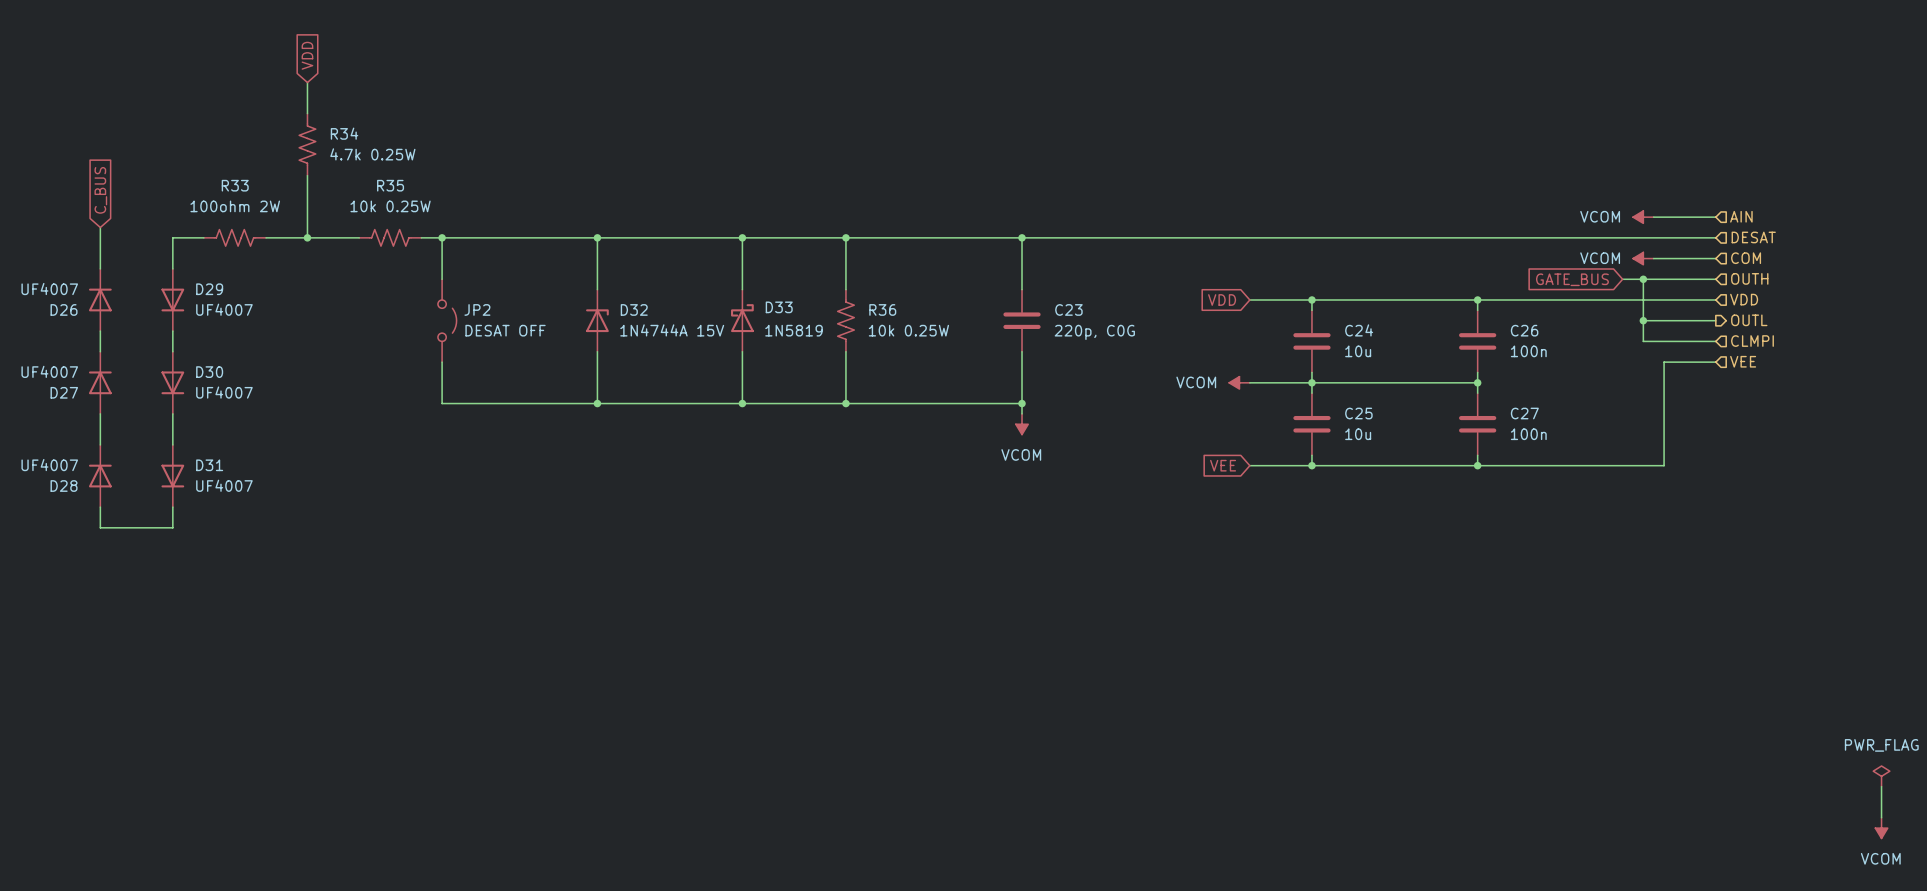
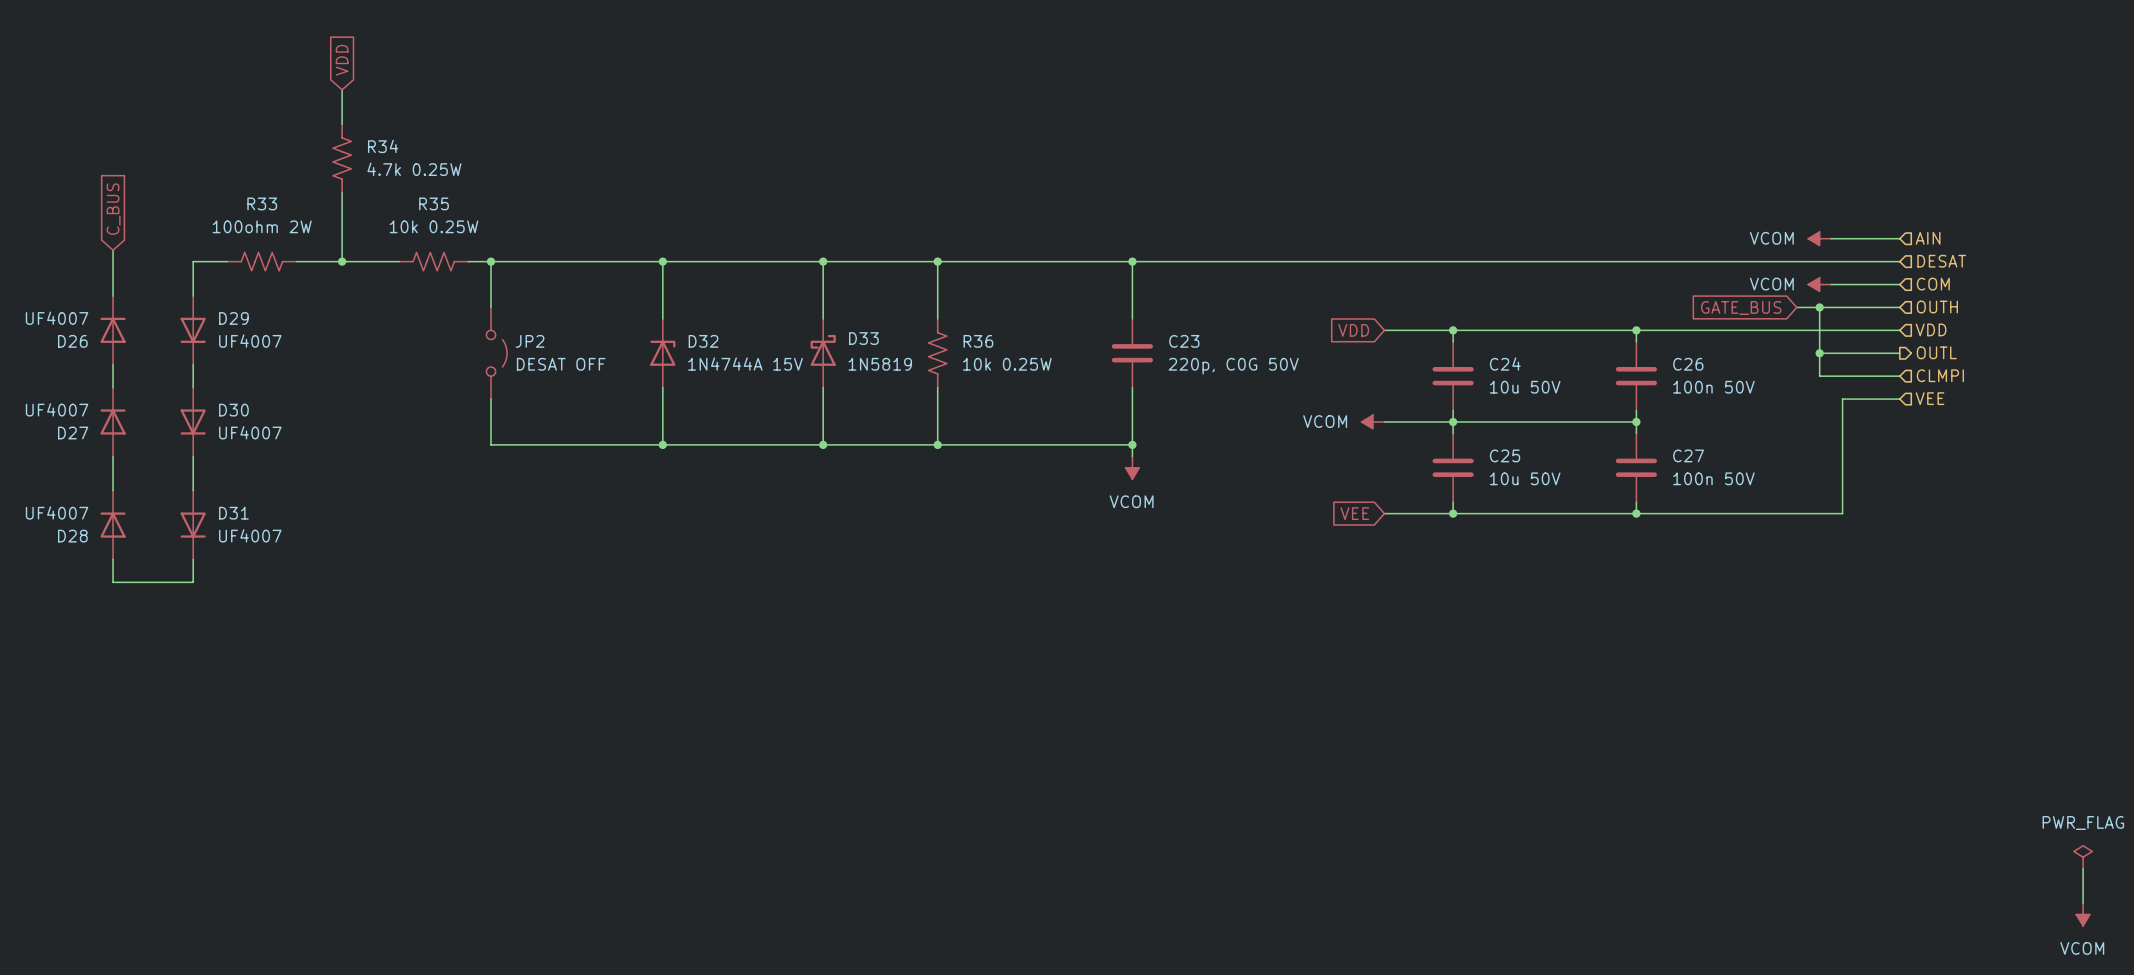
C23 value: 220p, C0G (1094, 332) -> 220p, C0G 50V (1233, 366)
C24 value: 10u (1358, 351) -> 10u 50V (1525, 387)
C26 value: 100n (1528, 351) -> 100n 50V (1713, 387)
C25 value: 10u (1358, 434) -> 10u 50V (1525, 478)
C27 value: 100n (1528, 434) -> 100n 50V (1713, 478)

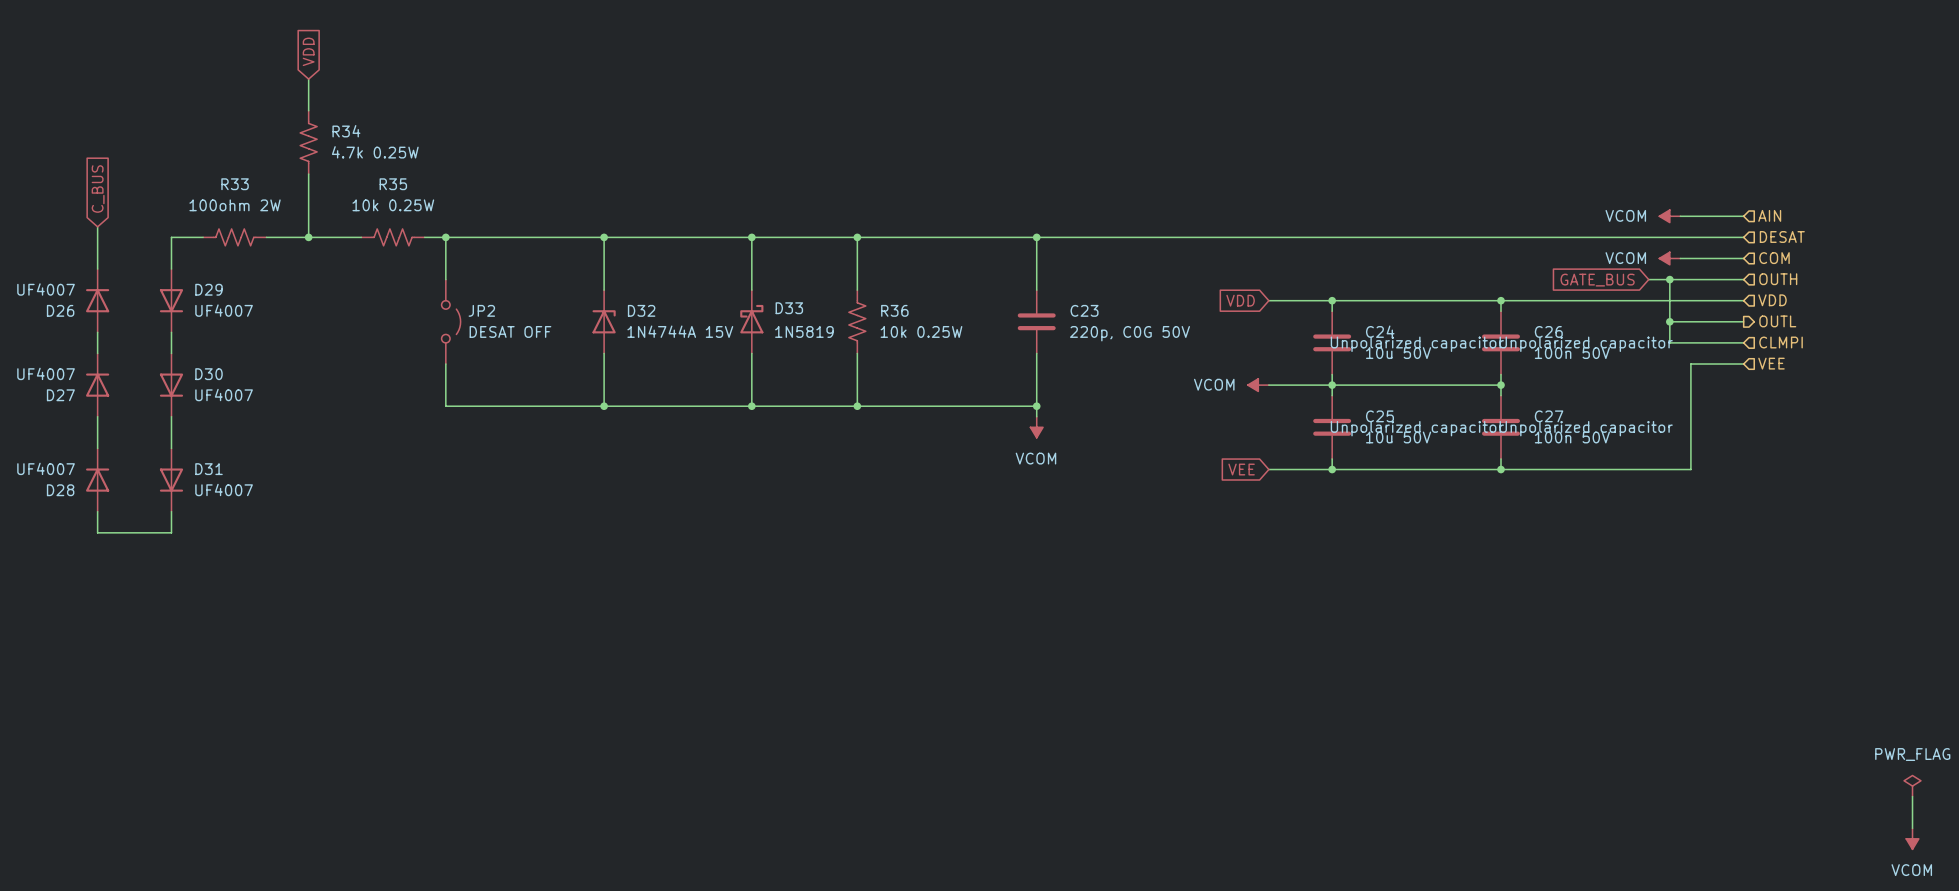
C24 text: none -> Unpolarized capacitor (1417, 344)
C26 text: none -> Unpolarized capacitor (1586, 344)
C25 text: none -> Unpolarized capacitor (1417, 428)
C27 text: none -> Unpolarized capacitor (1586, 428)

